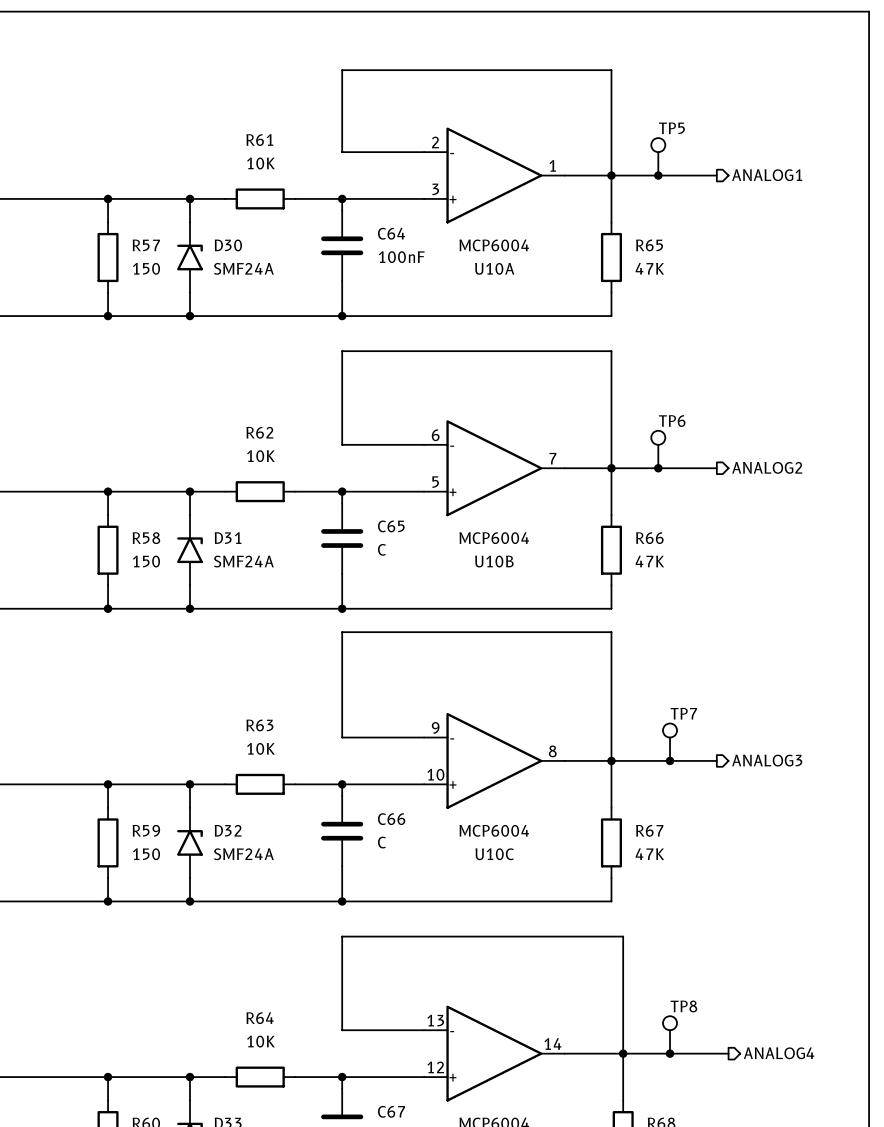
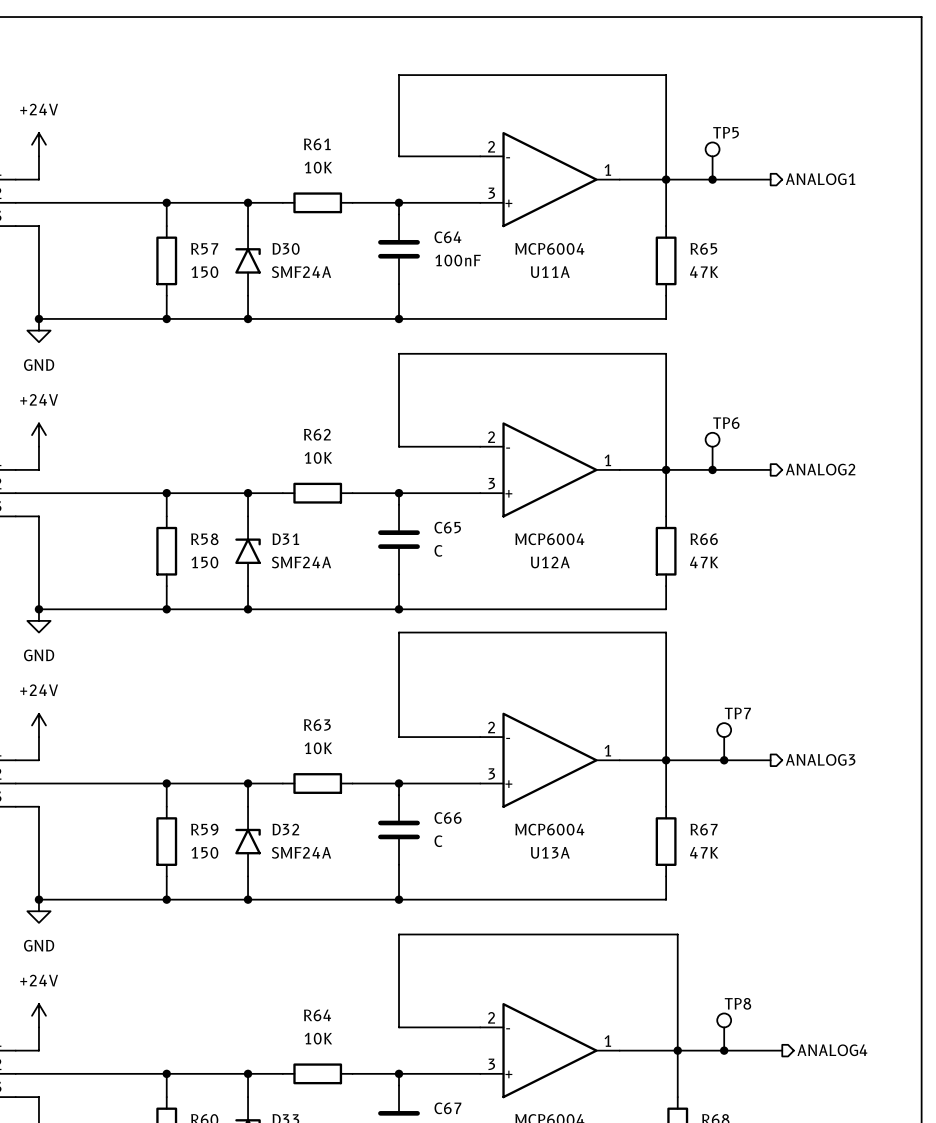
U10A name: U10A (494, 268) -> U11A (550, 272)
U10B pin number: 6 (435, 435) -> 2 (491, 437)
U10B pin number: 7 (552, 458) -> 1 (607, 460)
U10B pin number: 5 (435, 482) -> 3 (491, 483)
U10B name: U10B (494, 561) -> U12A (550, 562)
U10C pin number: 9 (435, 727) -> 2 (491, 727)
U10C pin number: 8 (552, 751) -> 1 (607, 750)
U10C pin number: 10 (435, 774) -> 3 (491, 774)
U10C name: U10C (494, 854) -> U13A (550, 852)
part pin number: 13 (435, 1020) -> 2 (491, 1017)
part pin number: 14 (552, 1043) -> 1 (607, 1041)
part pin number: 12 (435, 1067) -> 3 (491, 1064)

